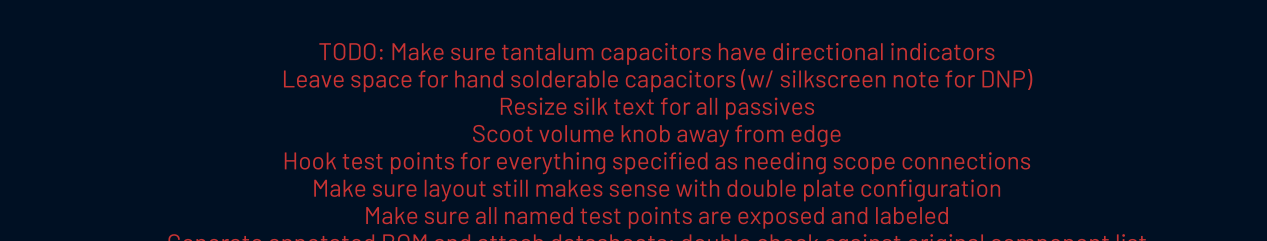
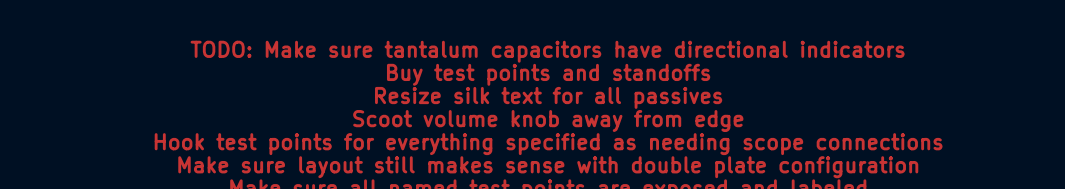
text: Leave space for hand solderable capacitors (w/ silkscreen note for DNP) (658, 80) -> Buy test points and standoffs (548, 74)

